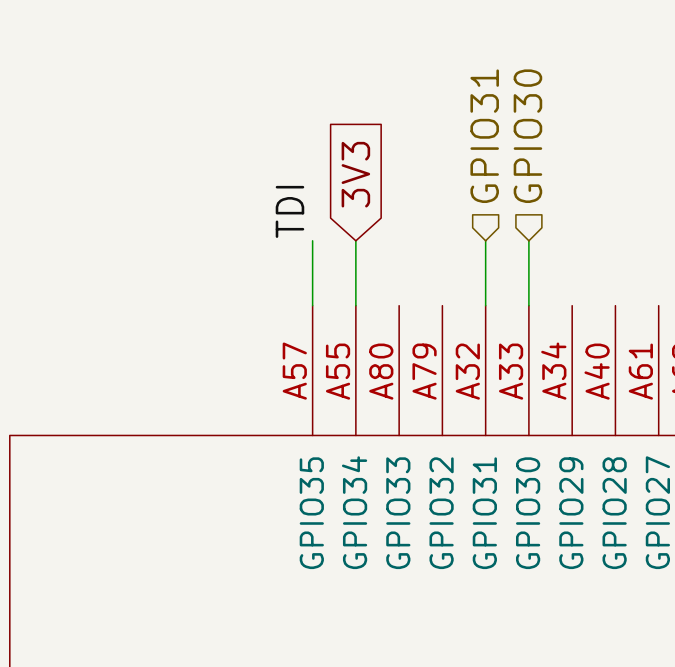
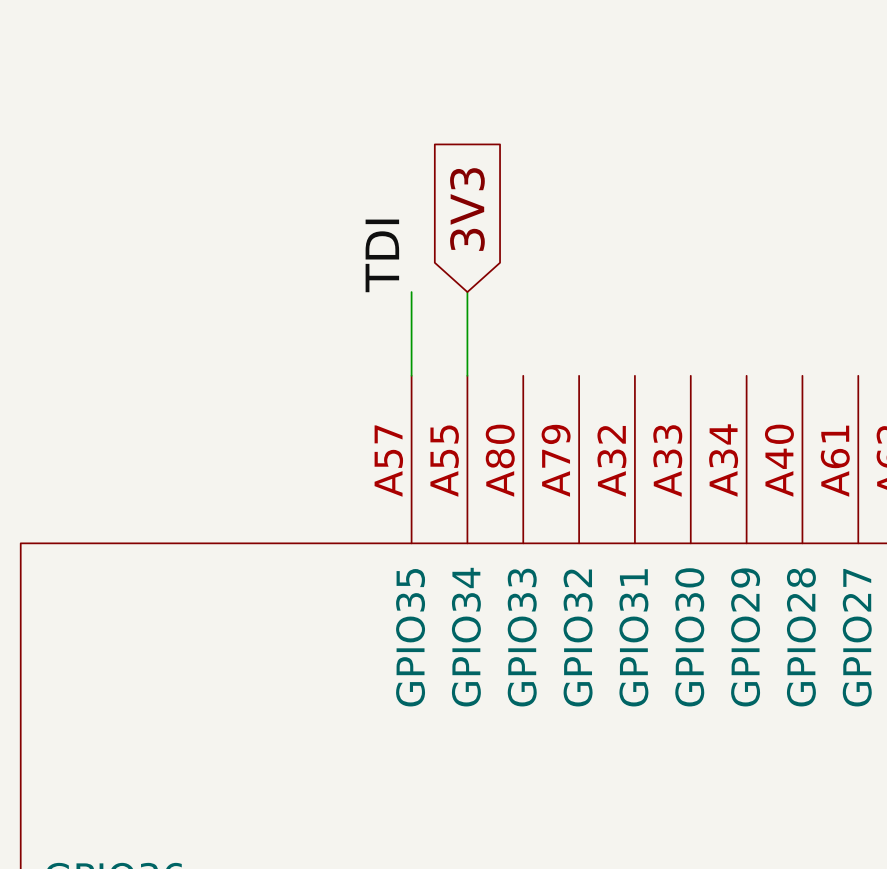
hierarchical label: GPIO31 (484, 136) -> none
hierarchical label: GPIO30 (527, 136) -> none
wire: (485, 240) (485, 305) -> none
wire: (528, 240) (528, 305) -> none

